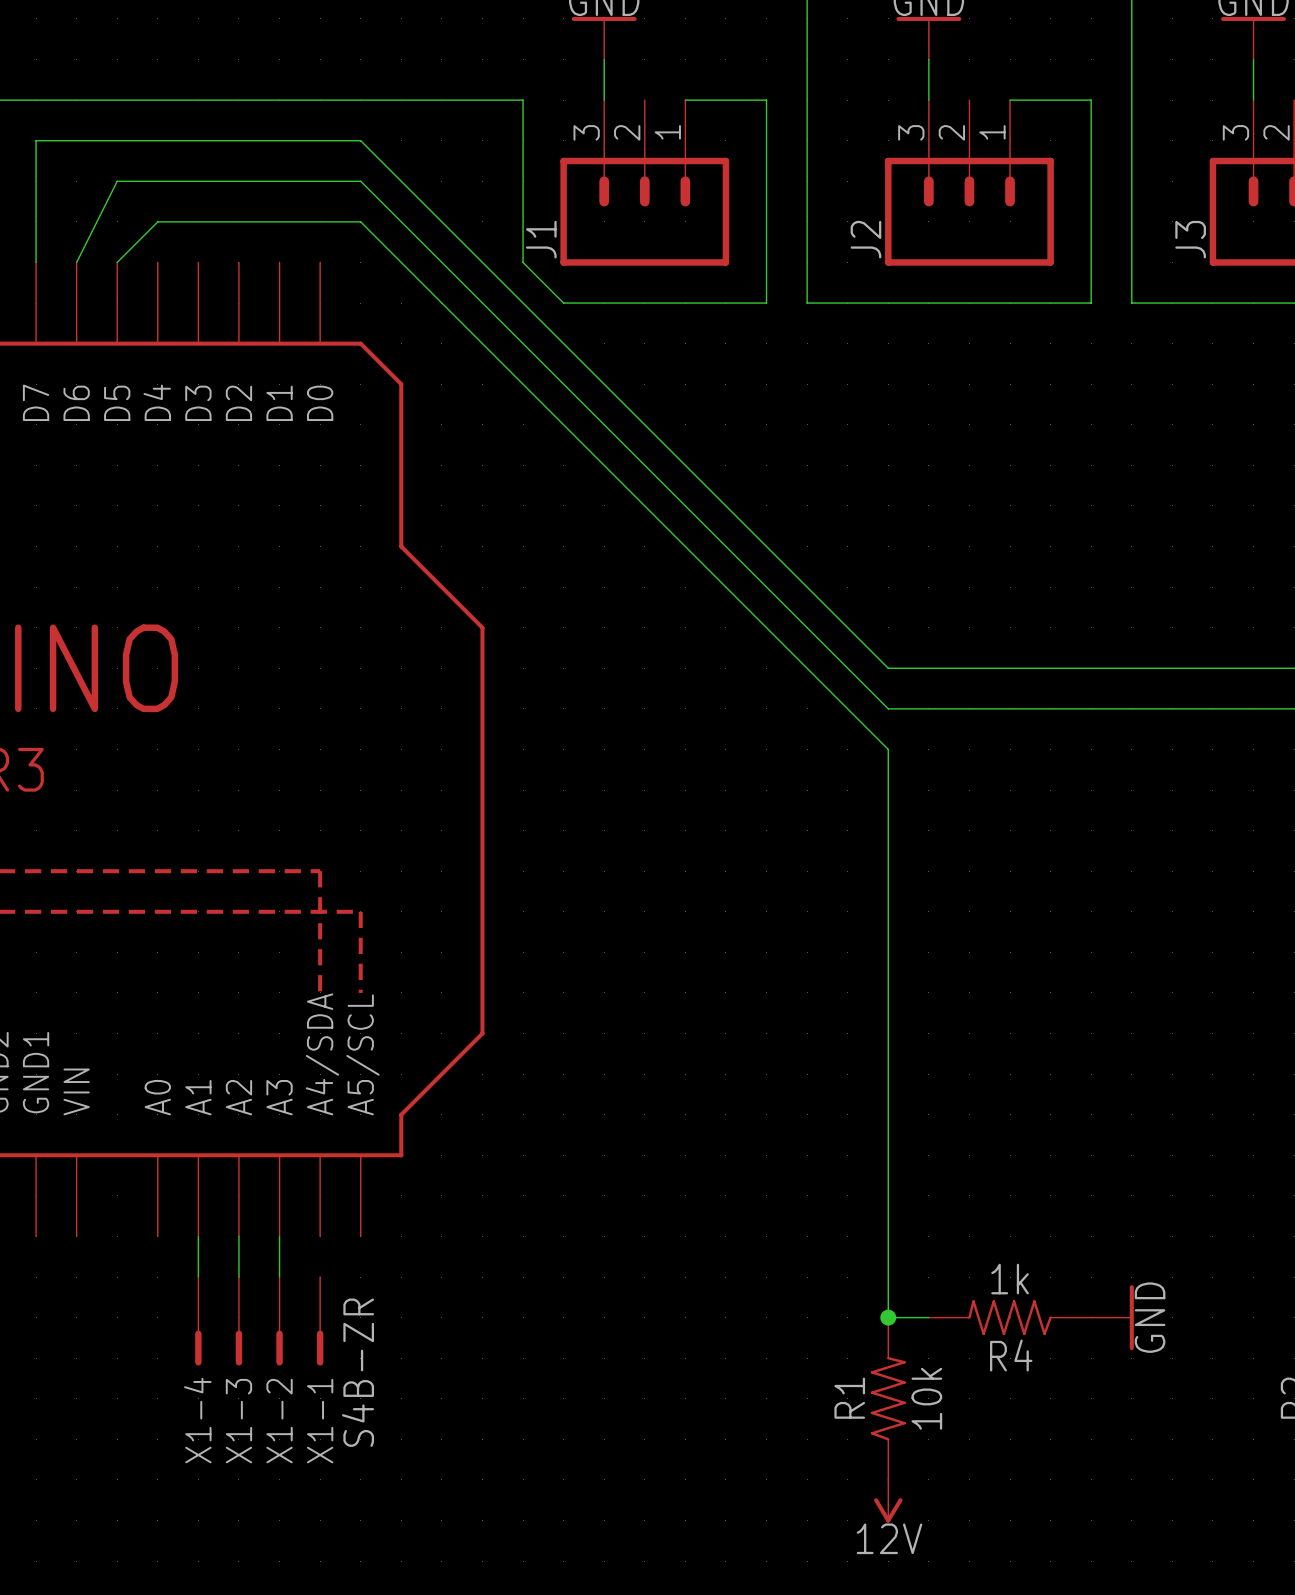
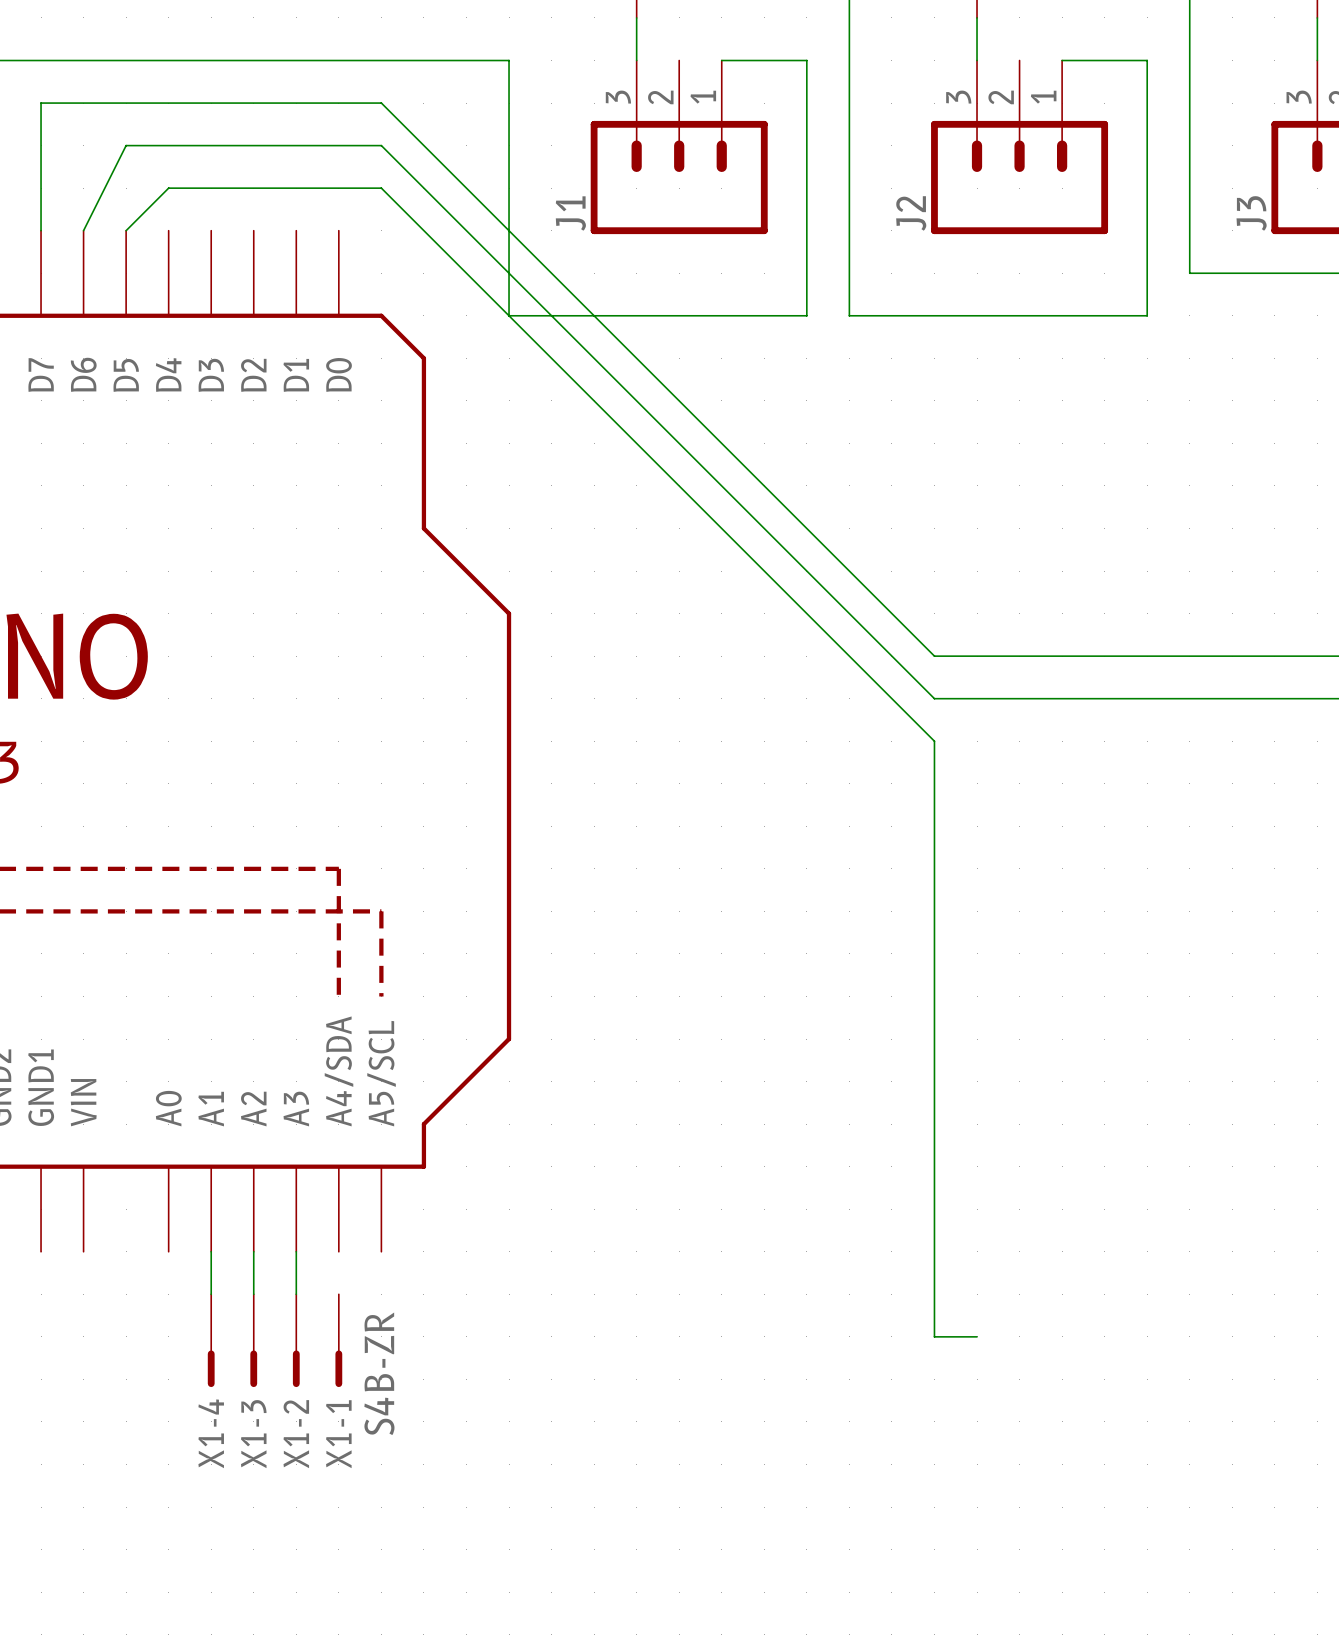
wire: (482, 100) (523, 100) (523, 262) (563, 303) (766, 303) -> (509, 60) (509, 315) (806, 315) (806, 273)
wire: (807, 303) (1091, 303) -> (849, 273) (849, 315) (1147, 315) (1147, 273)
junction: (888, 1317) -> none
R4: 1k (1010, 1317) -> none
power symbol: GND (1112, 1317) -> none
R1: 10k (888, 1398) -> none
power symbol: 12V (888, 1501) -> none

